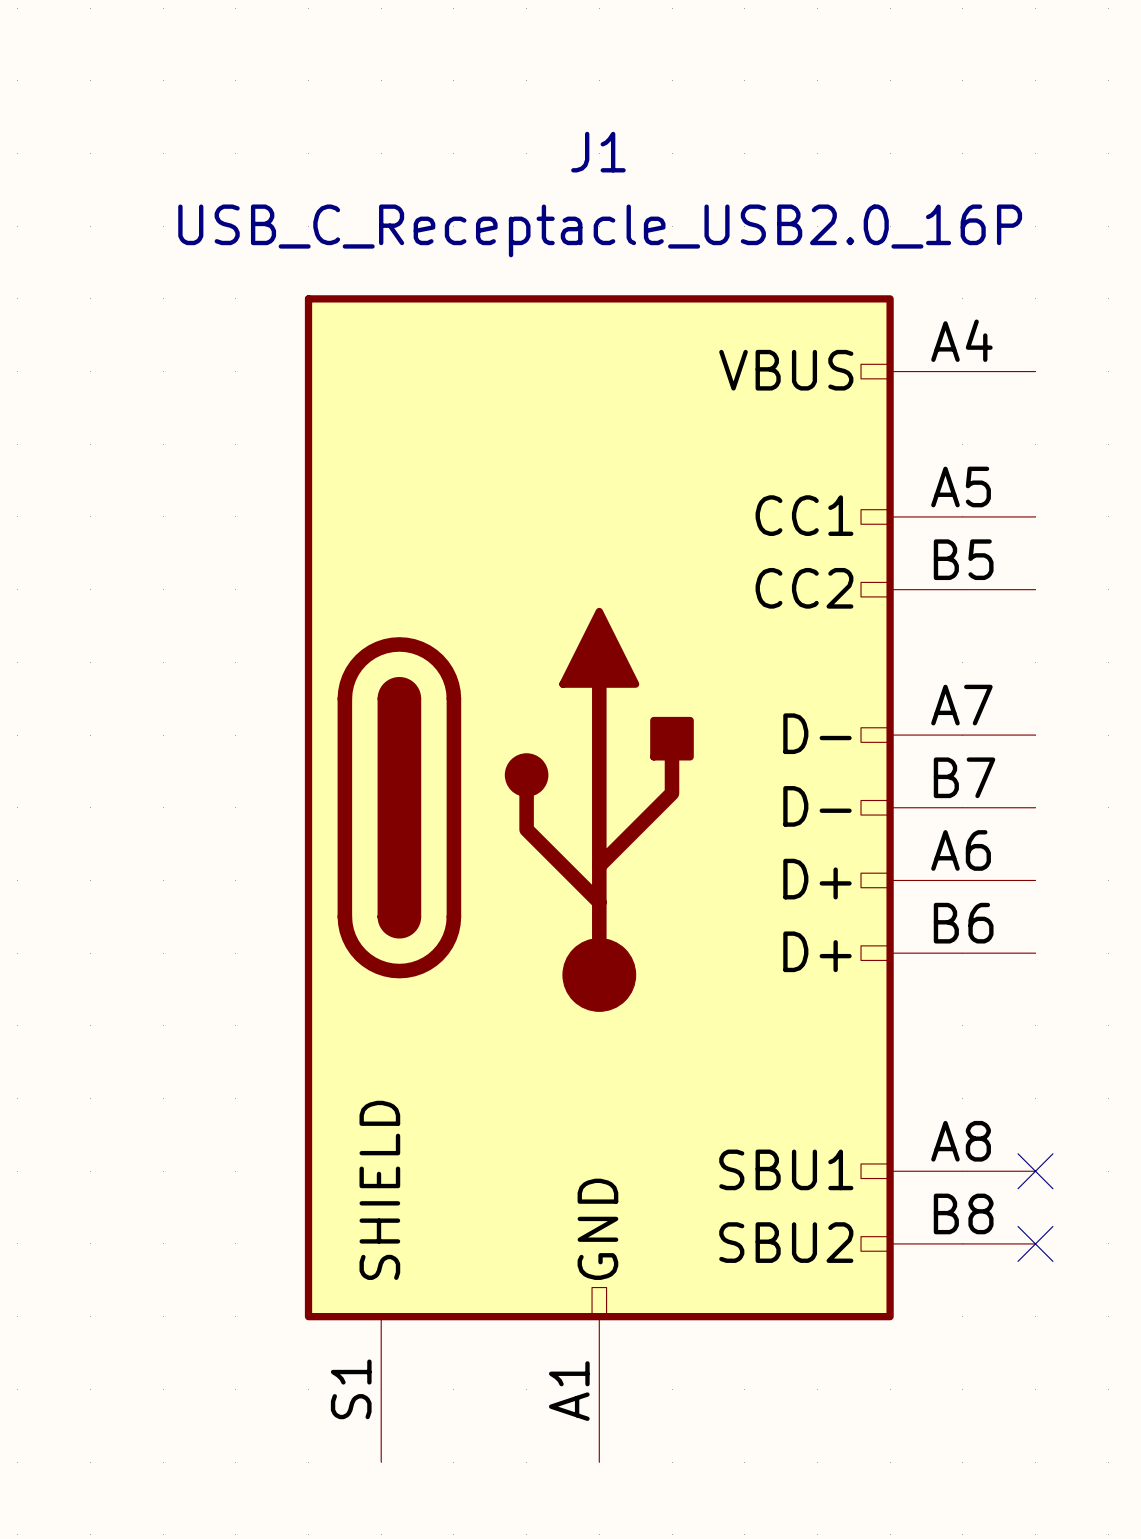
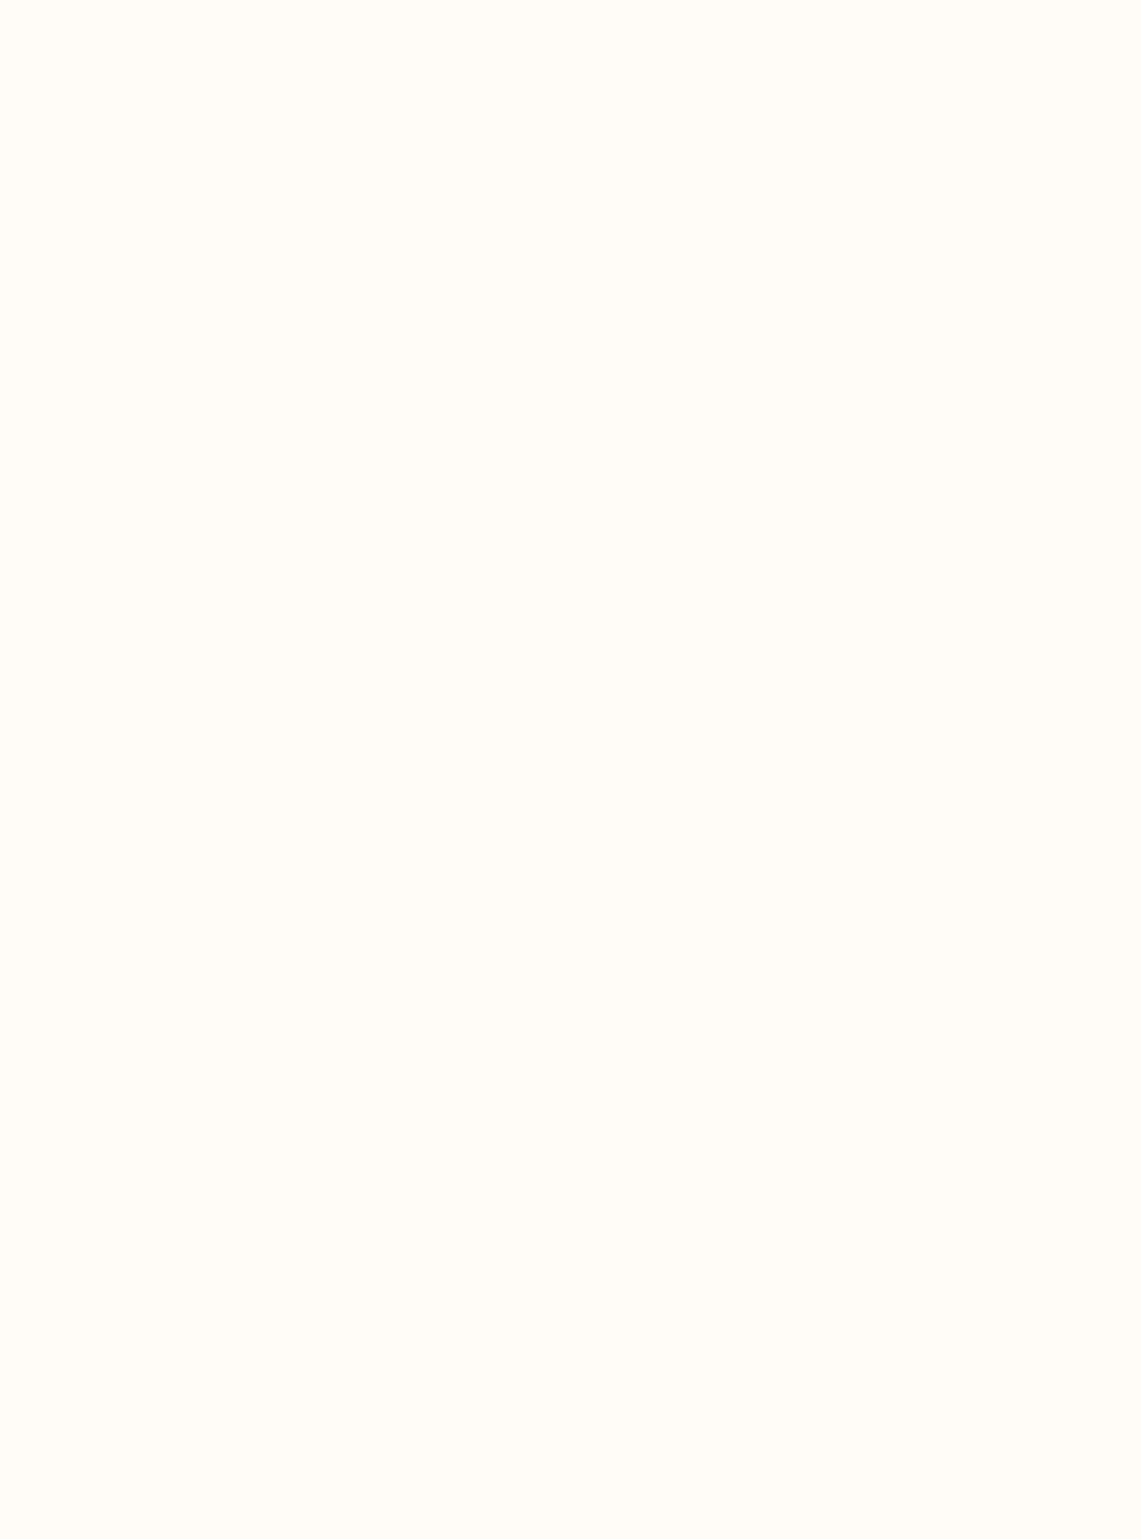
J1: USB_C_Receptacle_USB2.0_16P (670, 878) -> none
no-connect mark: (1035, 1171) -> none
no-connect mark: (1035, 1243) -> none

